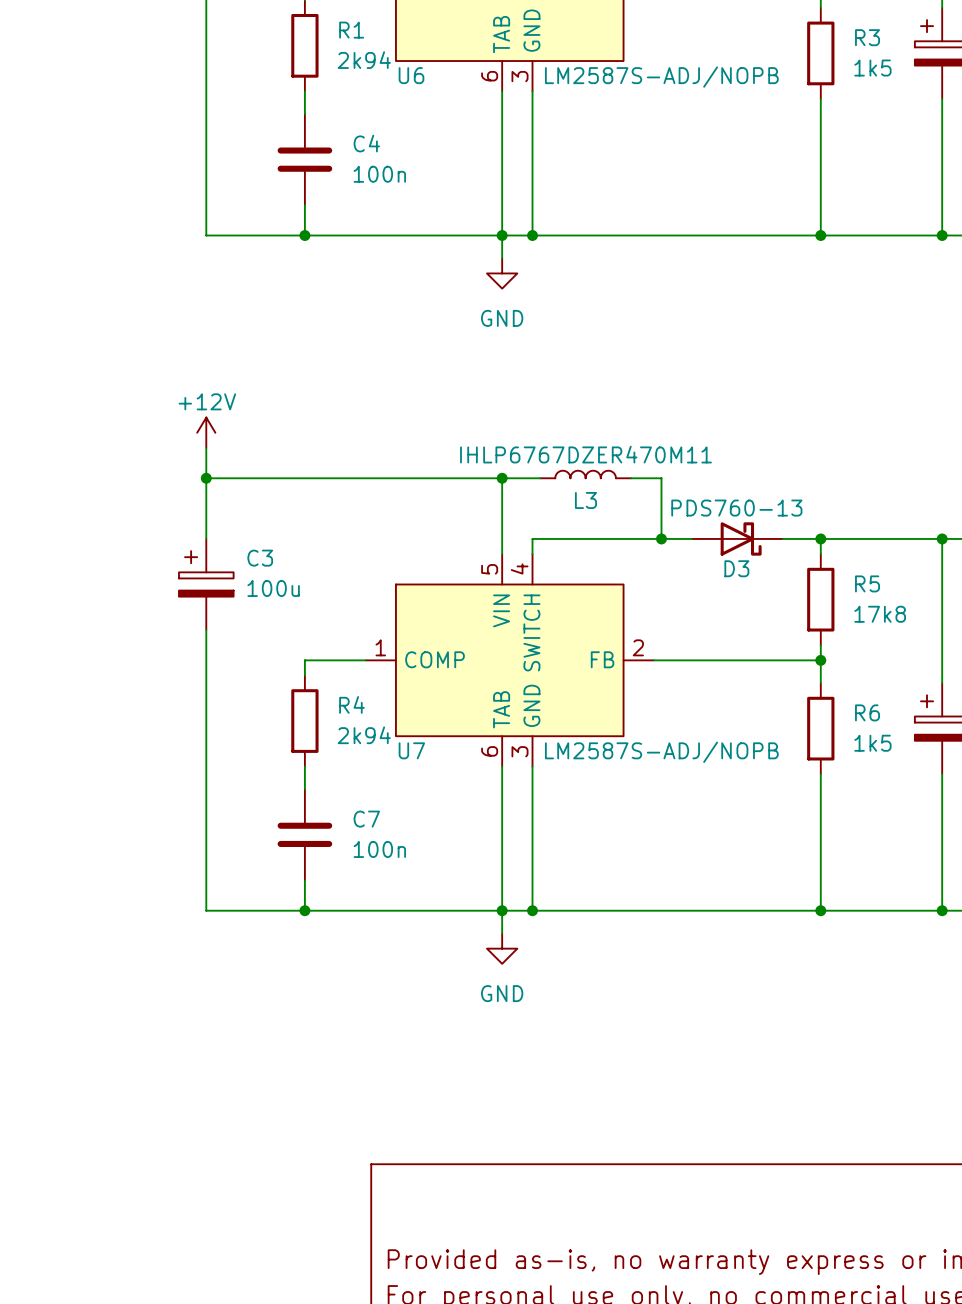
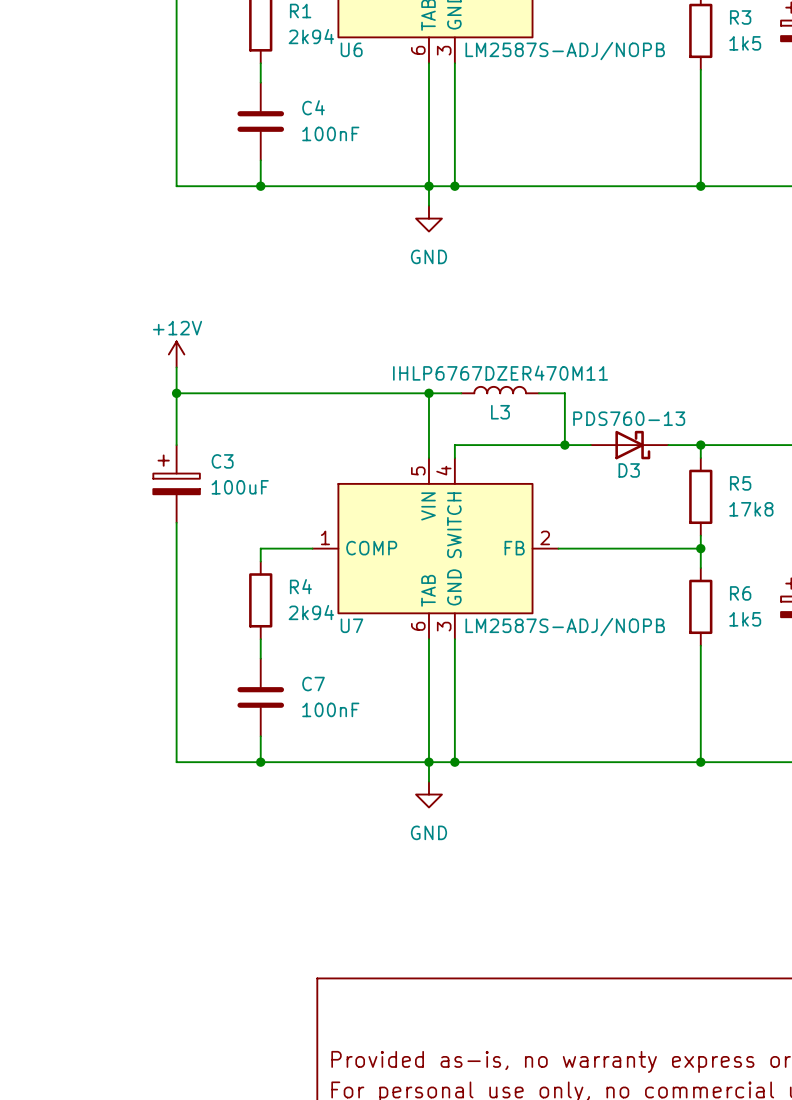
C4 value: 100n (379, 174) -> 100nF (330, 133)
C3 value: 100u (273, 588) -> 100uF (240, 487)
C7 value: 100n (379, 849) -> 100nF (330, 709)

